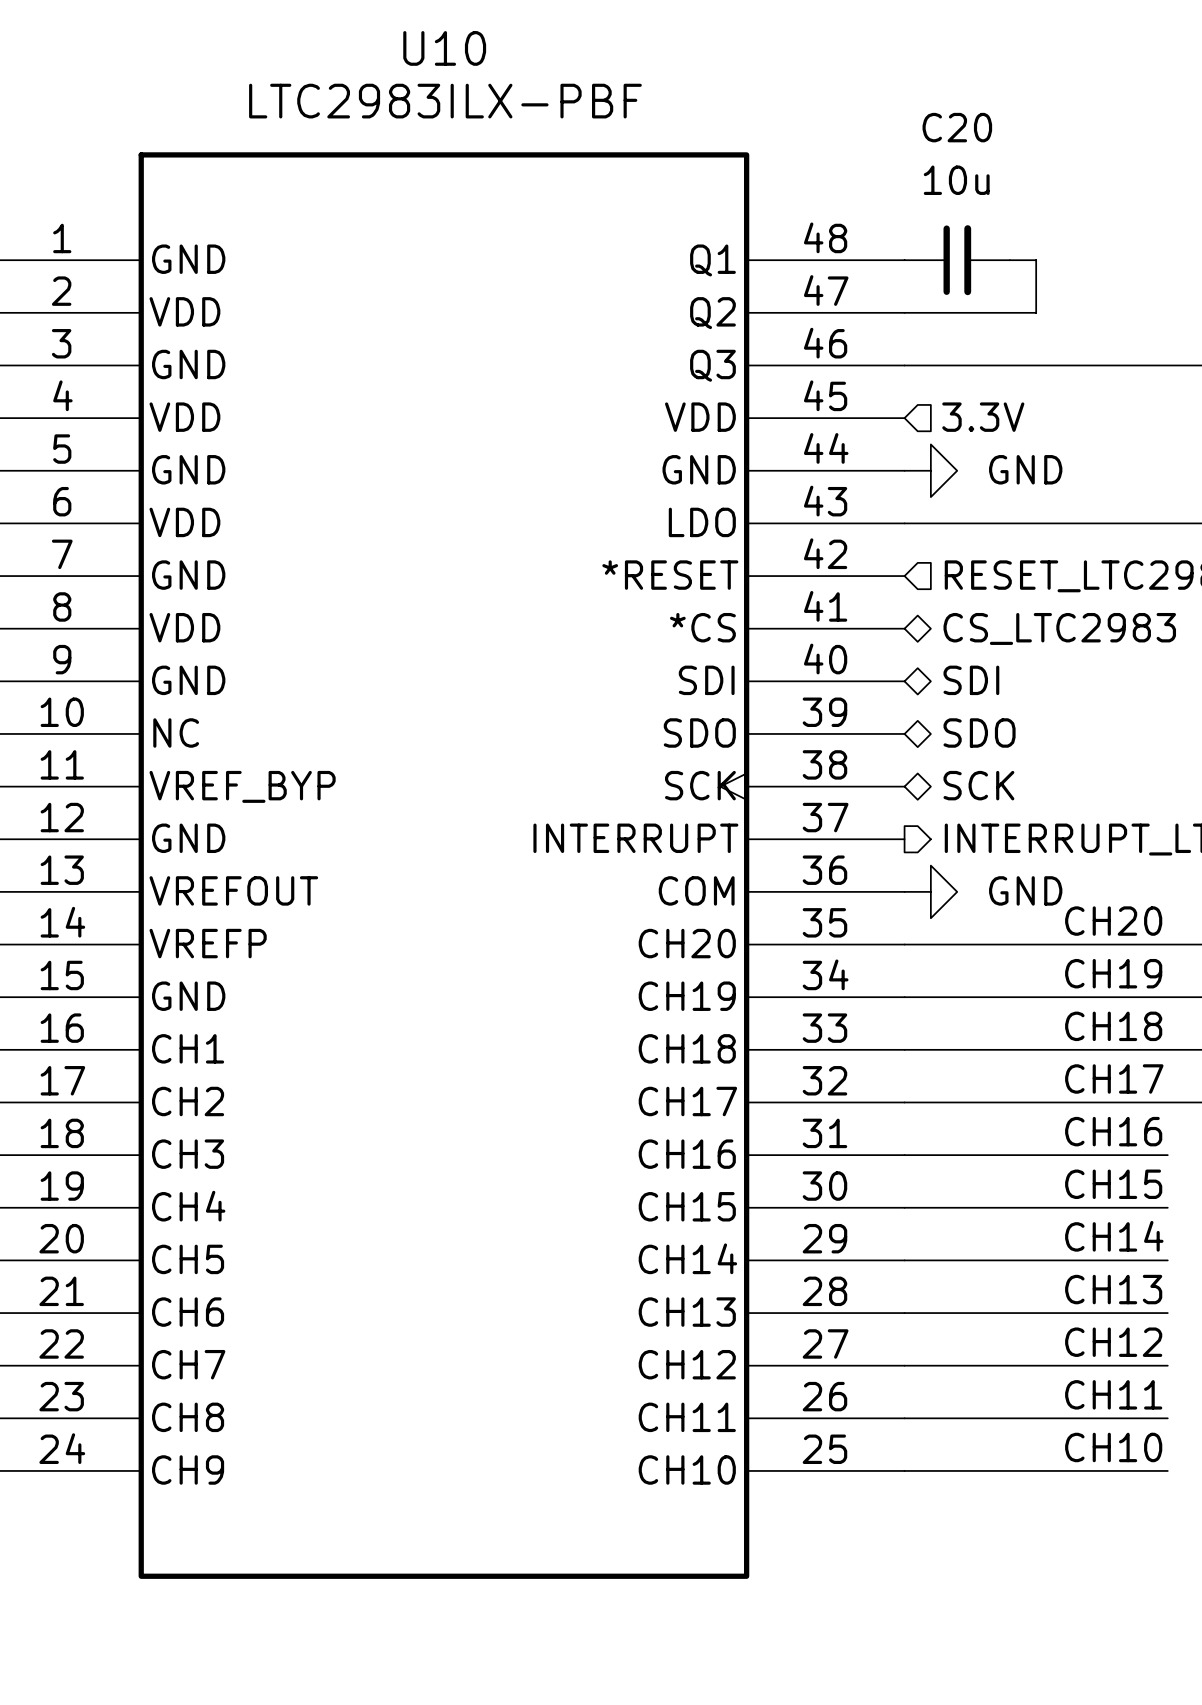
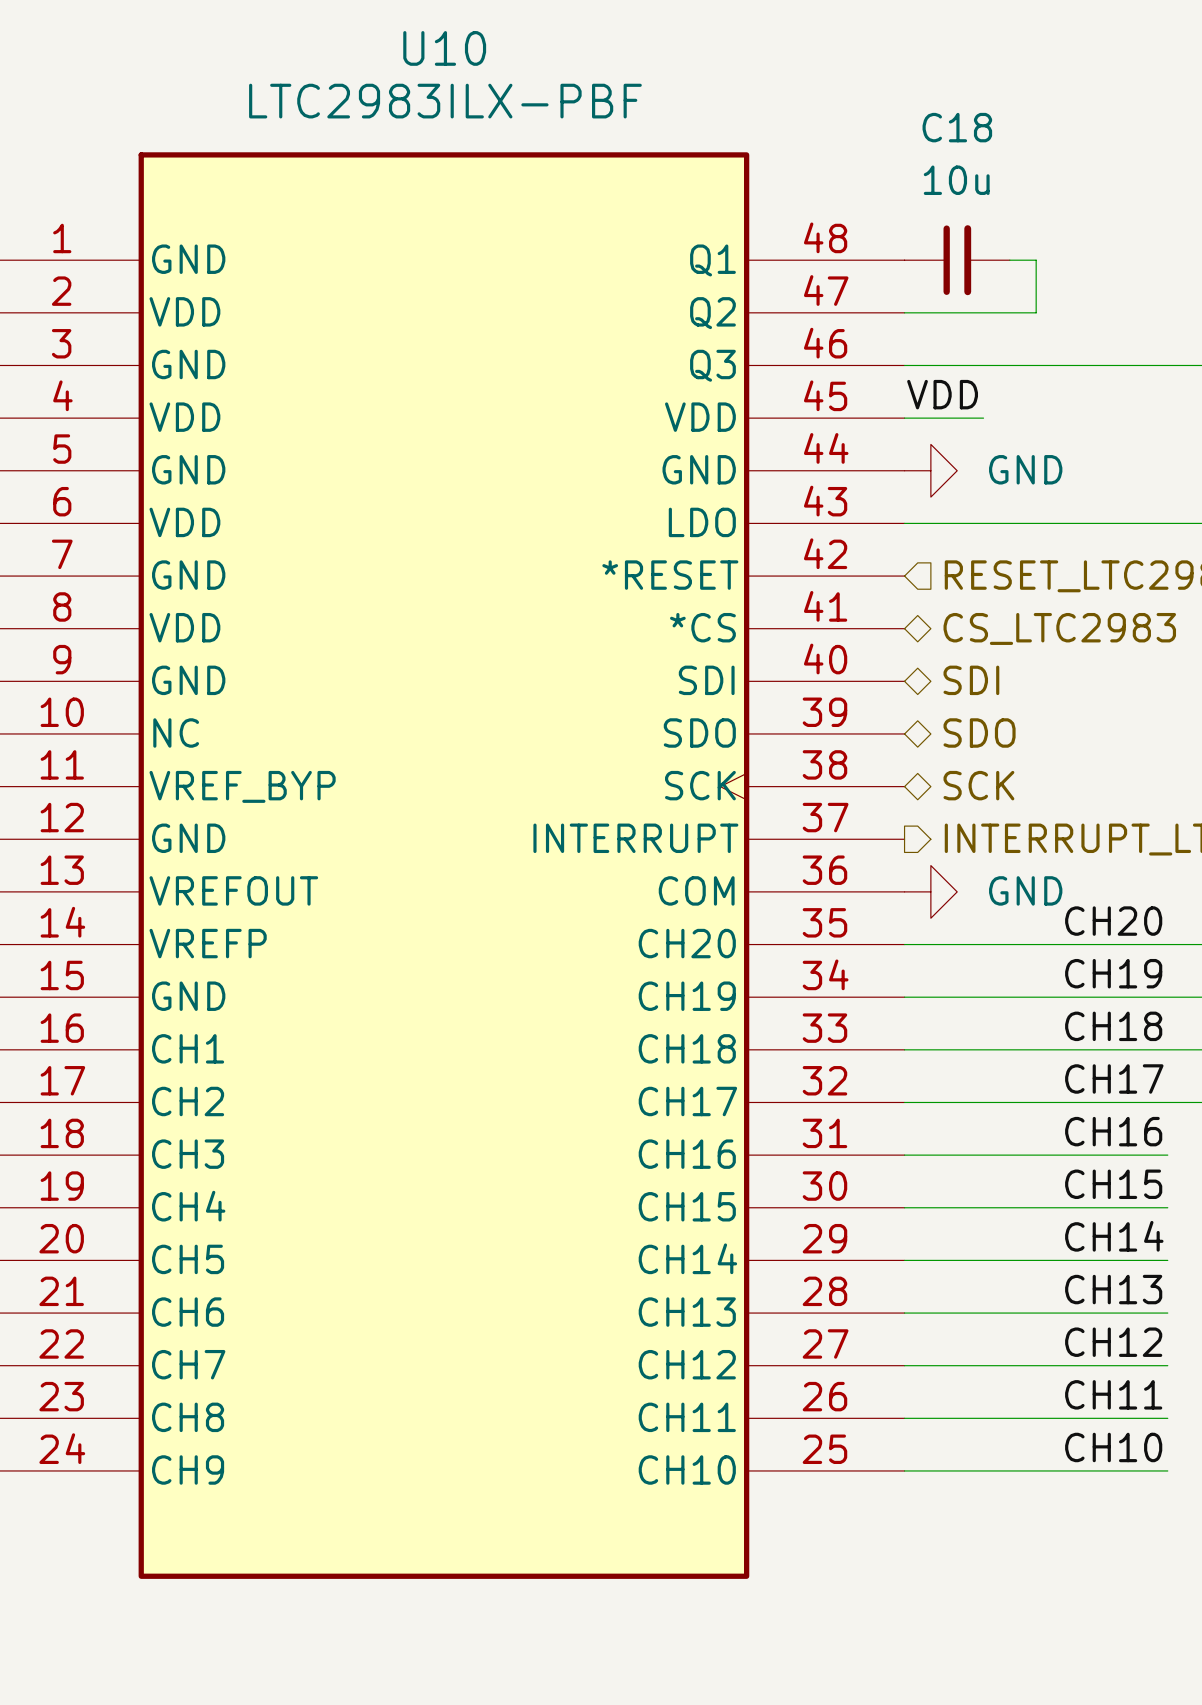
C20 name: C20 (957, 127) -> C18 (957, 127)
label: none -> VDD (942, 394)
hierarchical label: 3.3V (983, 417) -> none
wire: none -> (904, 418) (983, 418)

